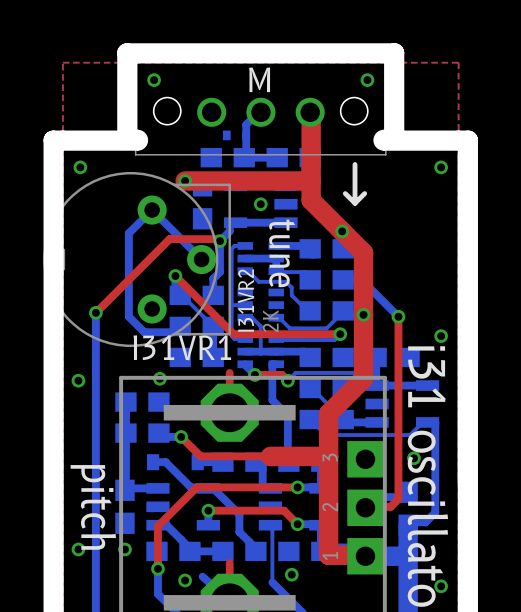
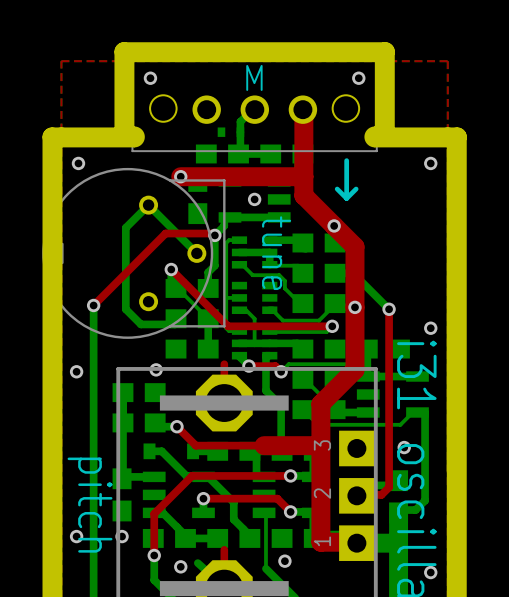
I31VR2: 2K (137, 259) -> none
part: none -> (133, 253)
I31VR1 name: I31VR1 (182, 347) -> none

